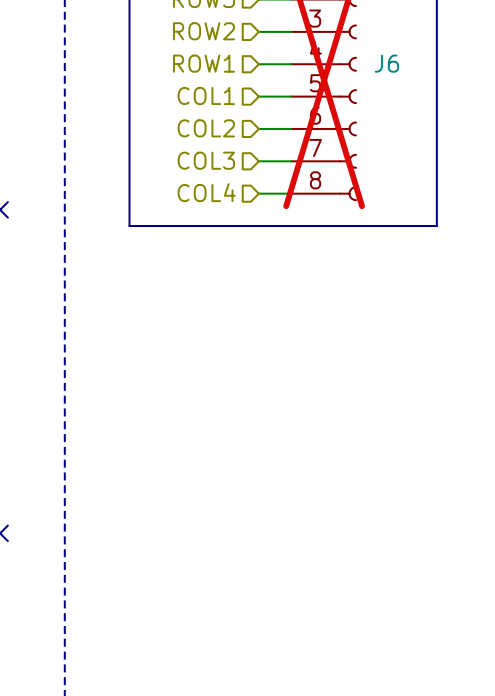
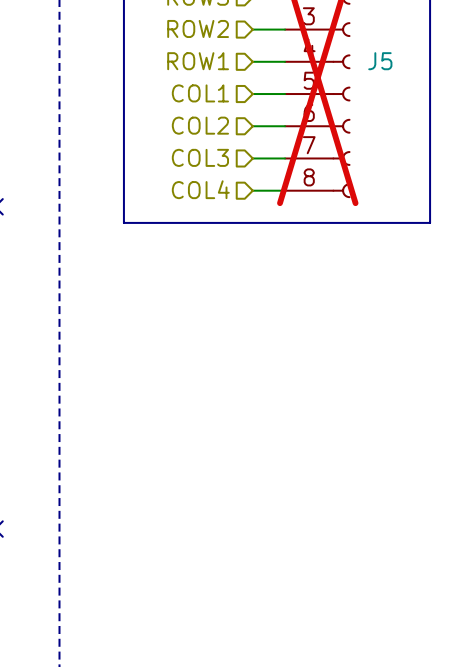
J6 name: J6 (386, 63) -> J5 (380, 61)

